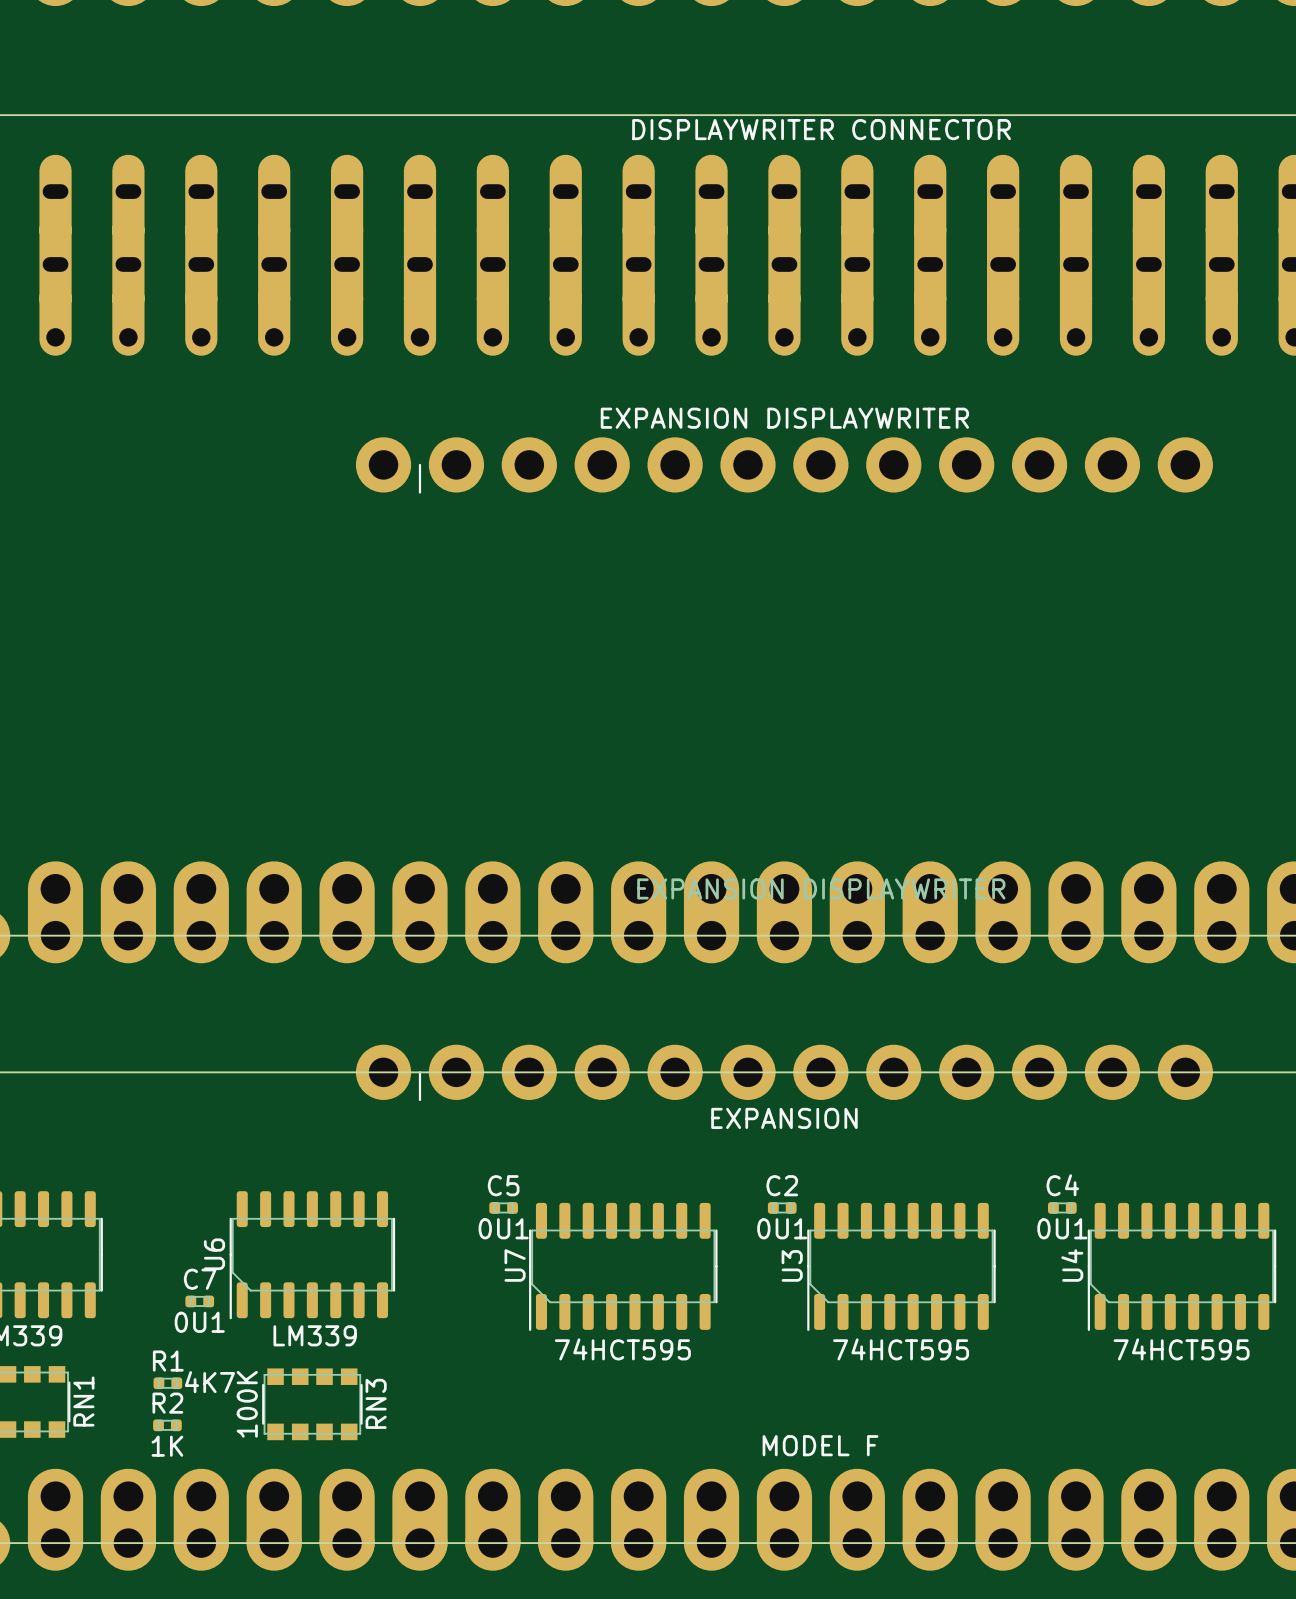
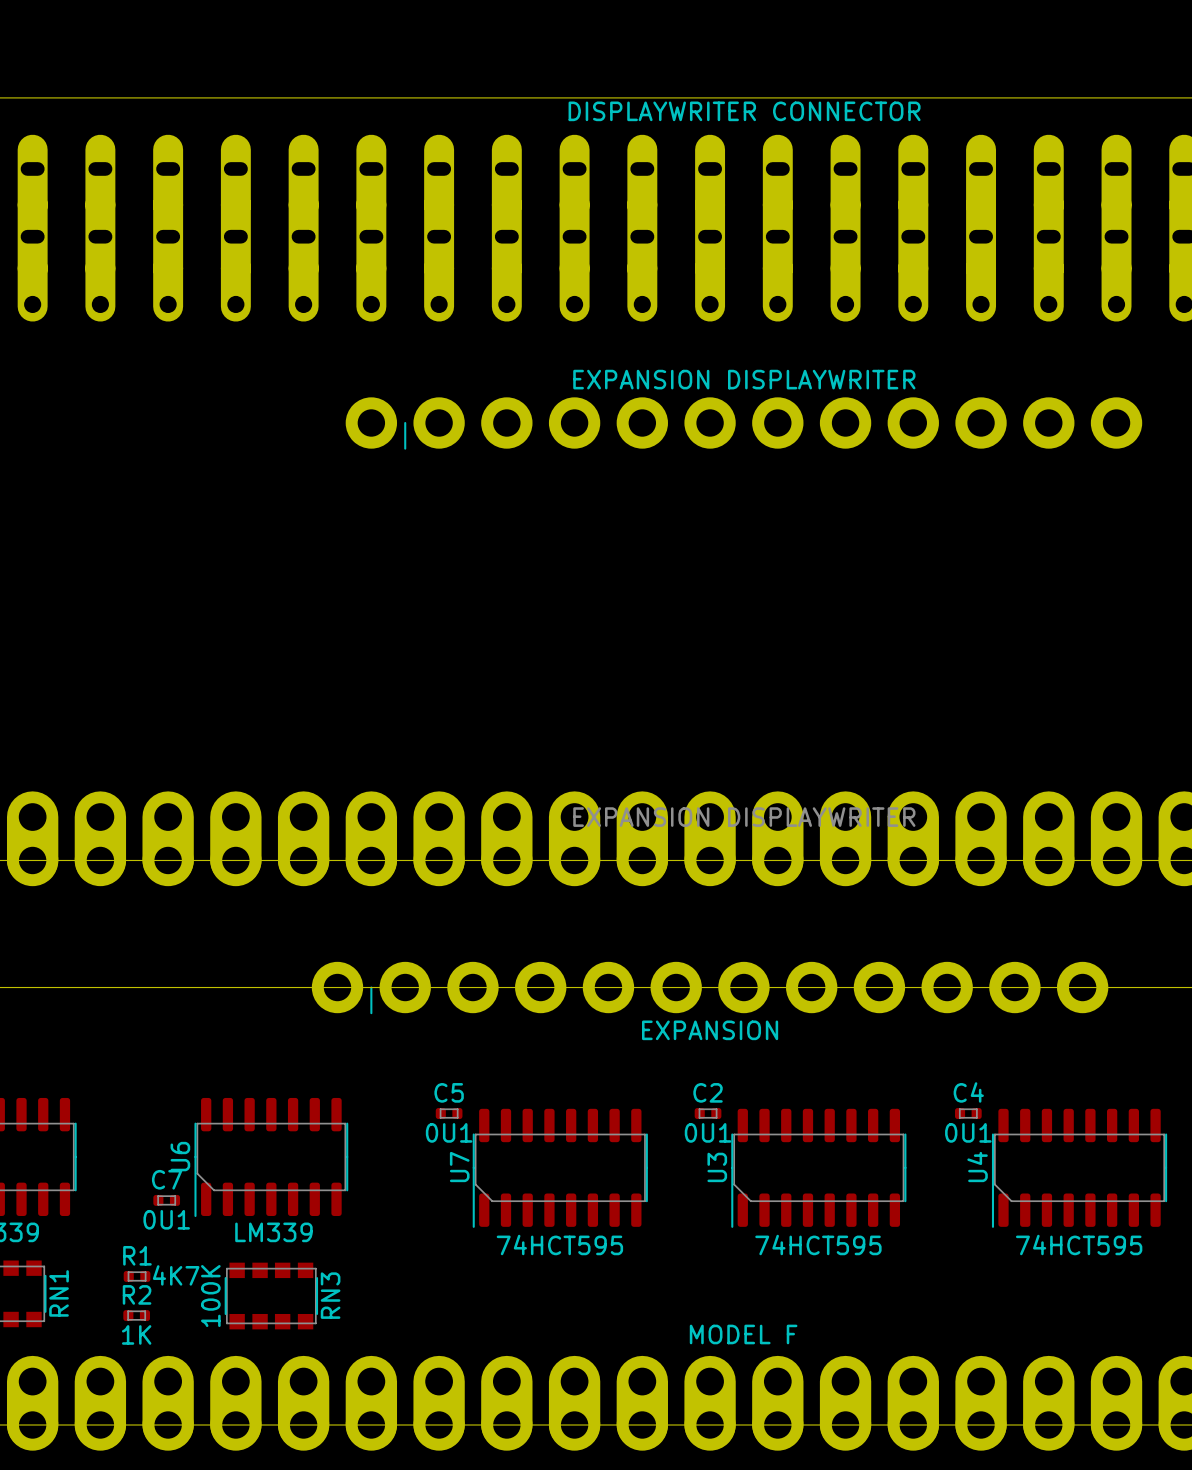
part position: (784, 465) -> (743, 423)

